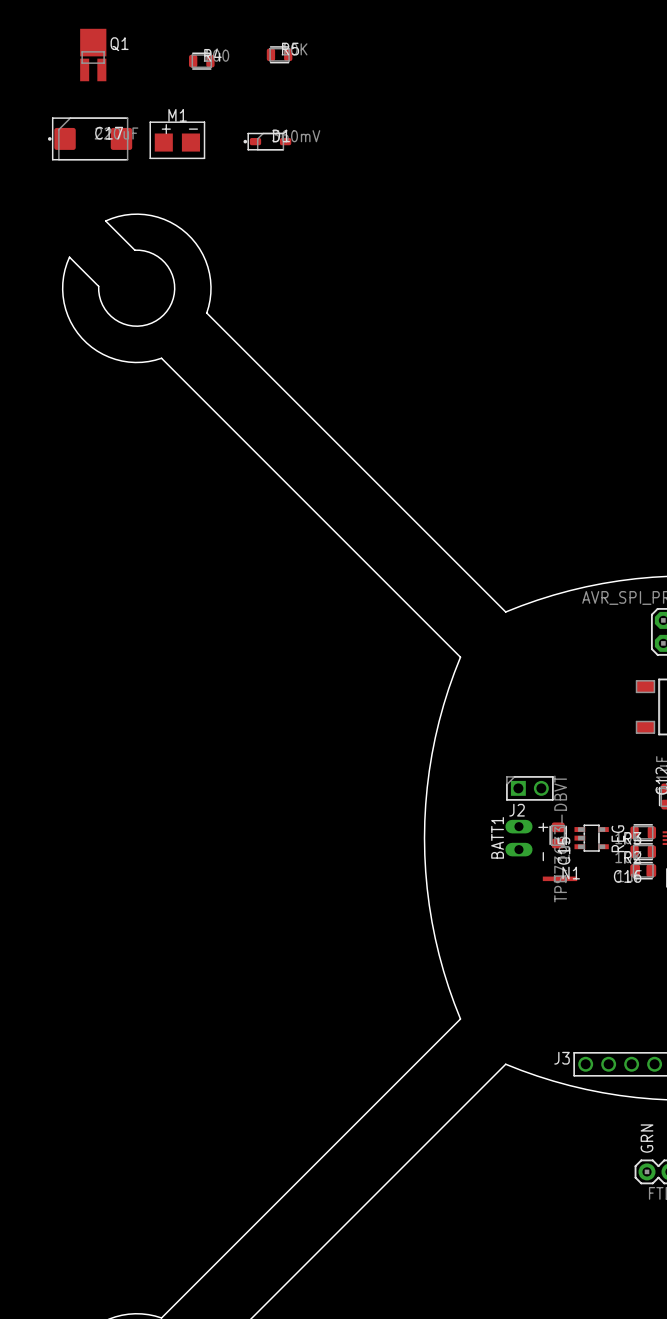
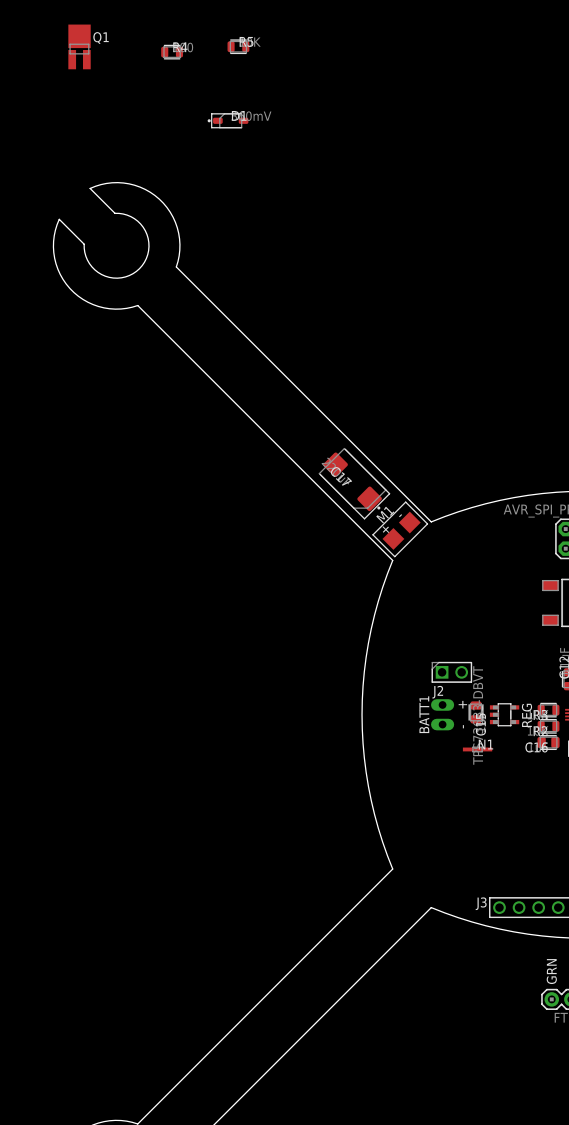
C17 rotation: 0° (90, 138) -> 135° counterclockwise (354, 483)
C17 position: (90, 138) -> (354, 483)
M1 rotation: 0° (177, 140) -> 45° counterclockwise (400, 529)
M1 position: (177, 140) -> (400, 529)

